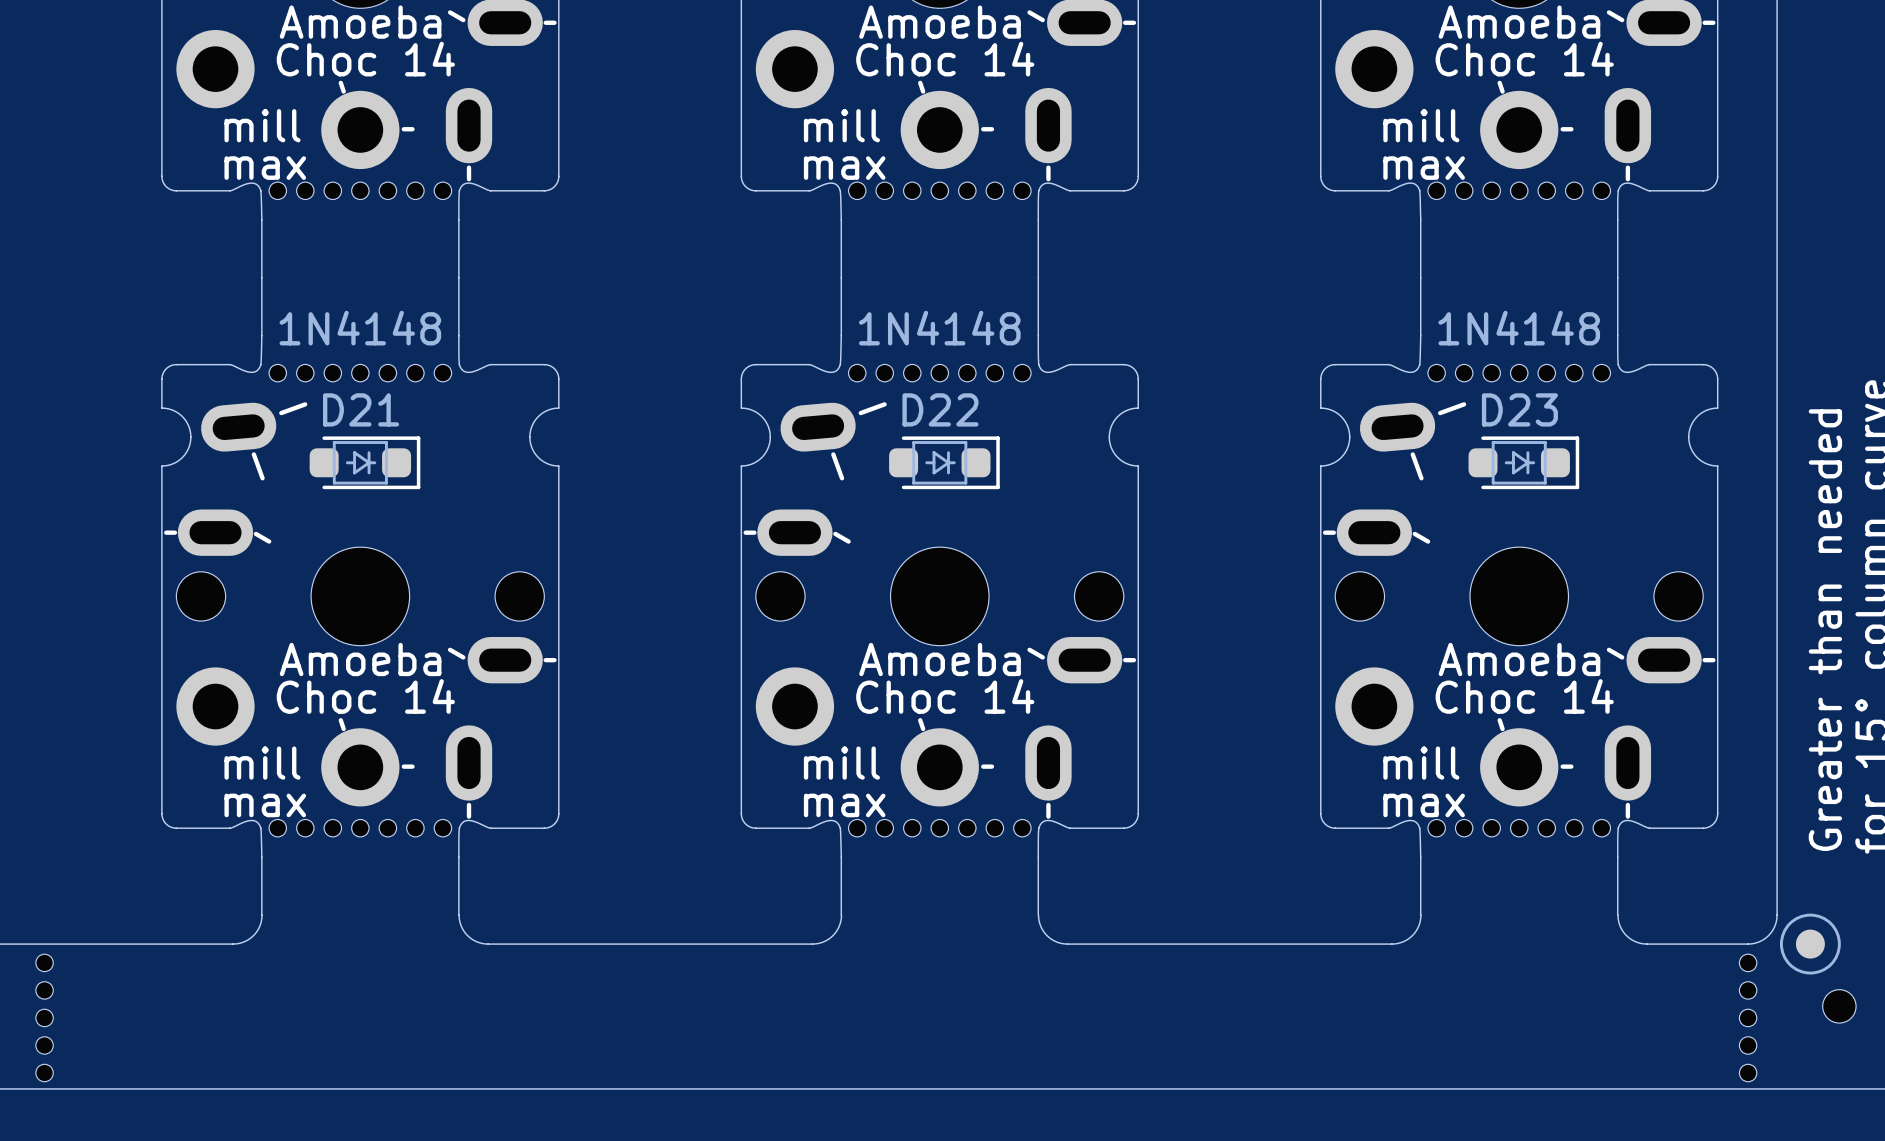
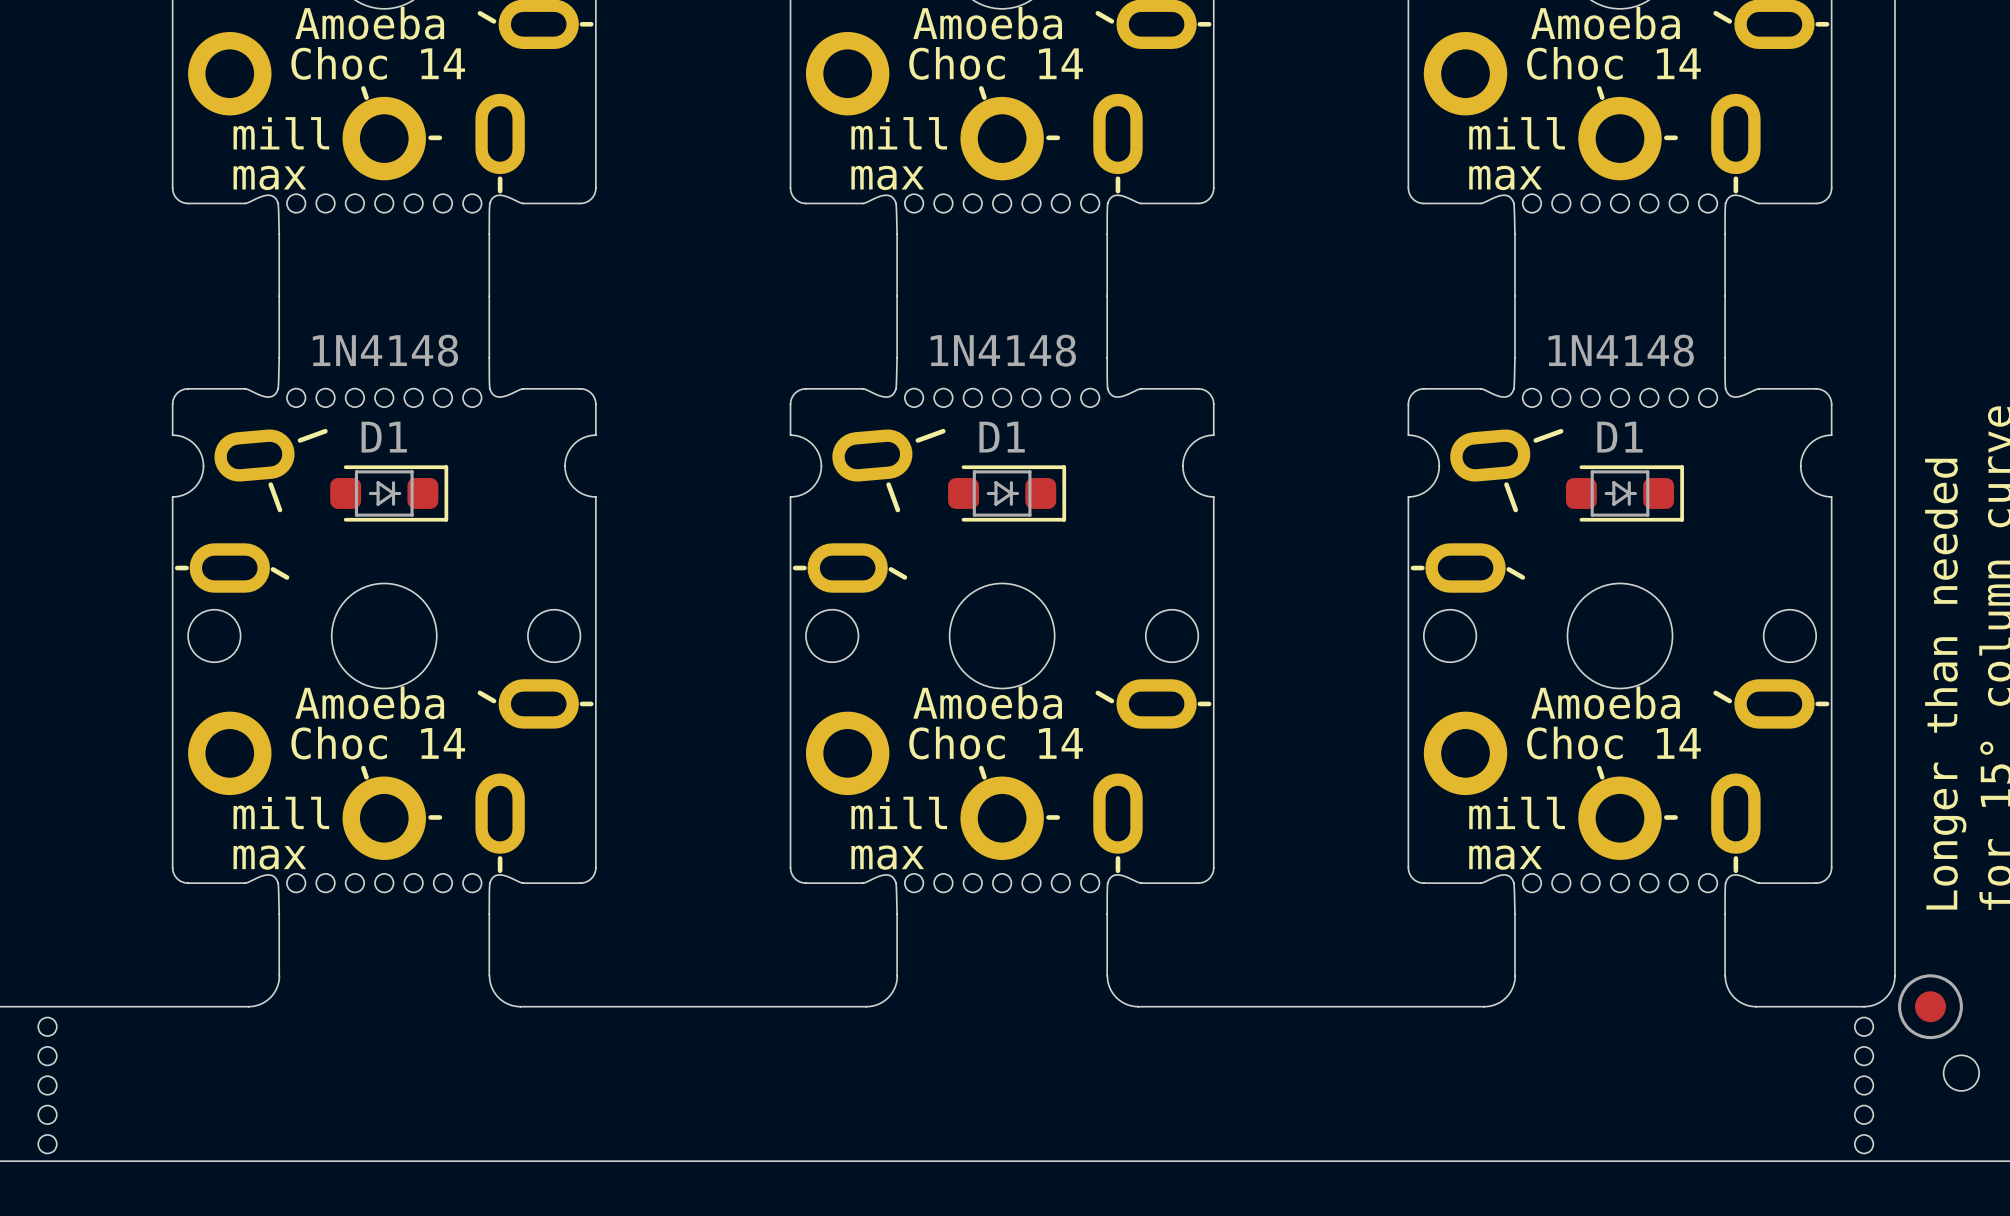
D21 name: D21 (361, 409) -> D1 (384, 437)
D22 name: D22 (940, 409) -> D1 (1002, 437)
D23 name: D23 (1519, 409) -> D1 (1619, 437)
text: Greater than needed (1825, 630) -> Longer than needed (1945, 684)

